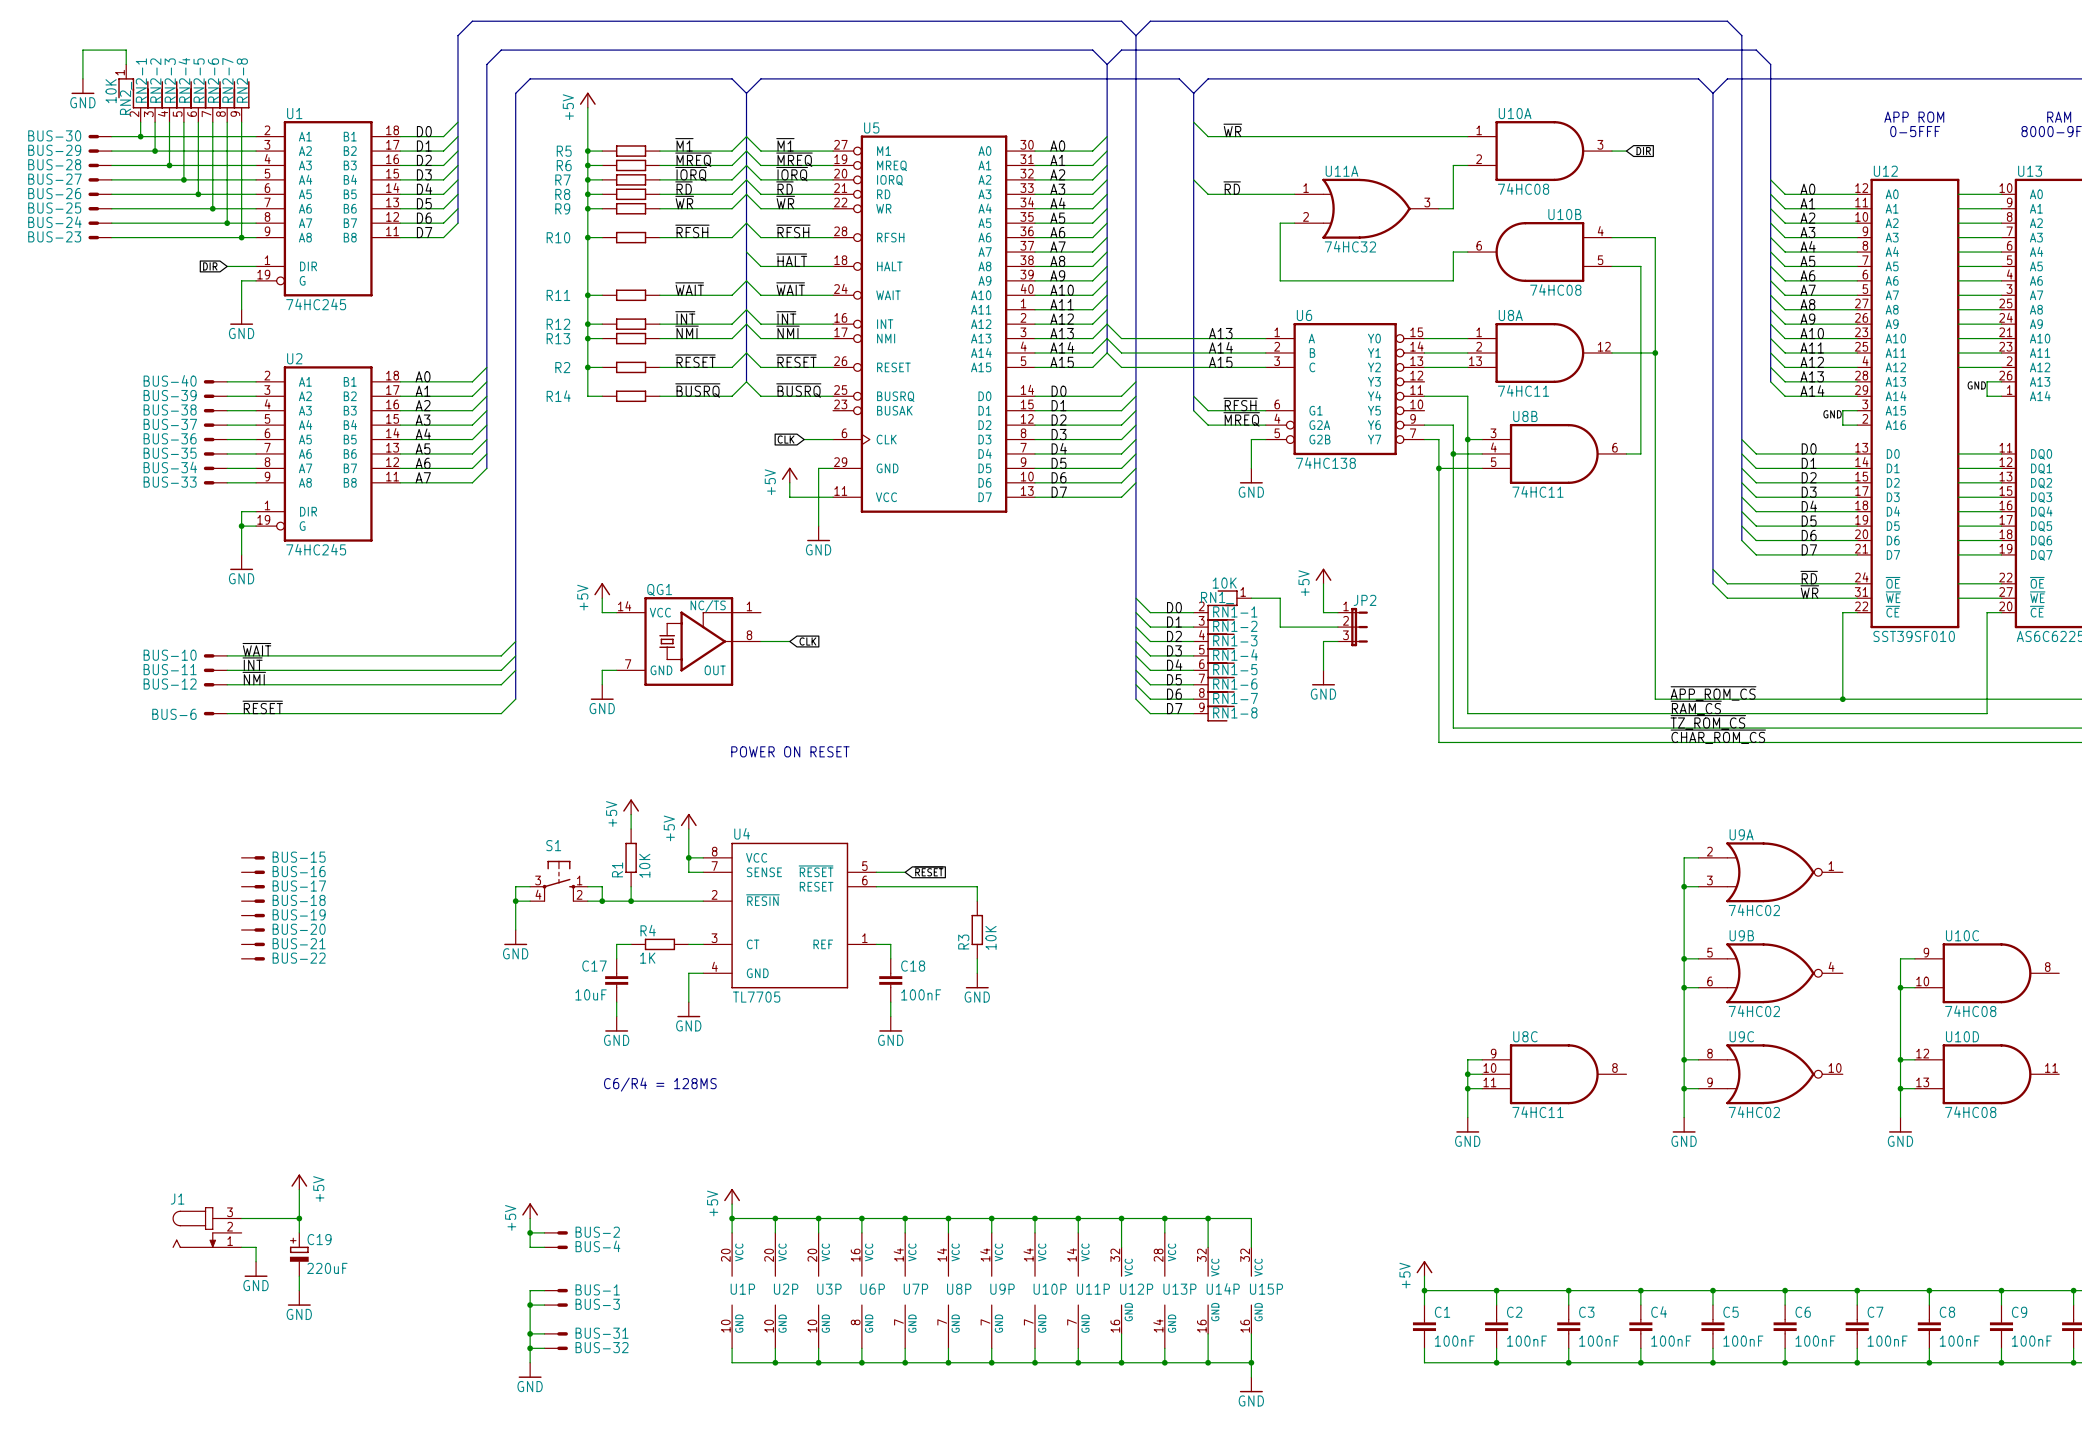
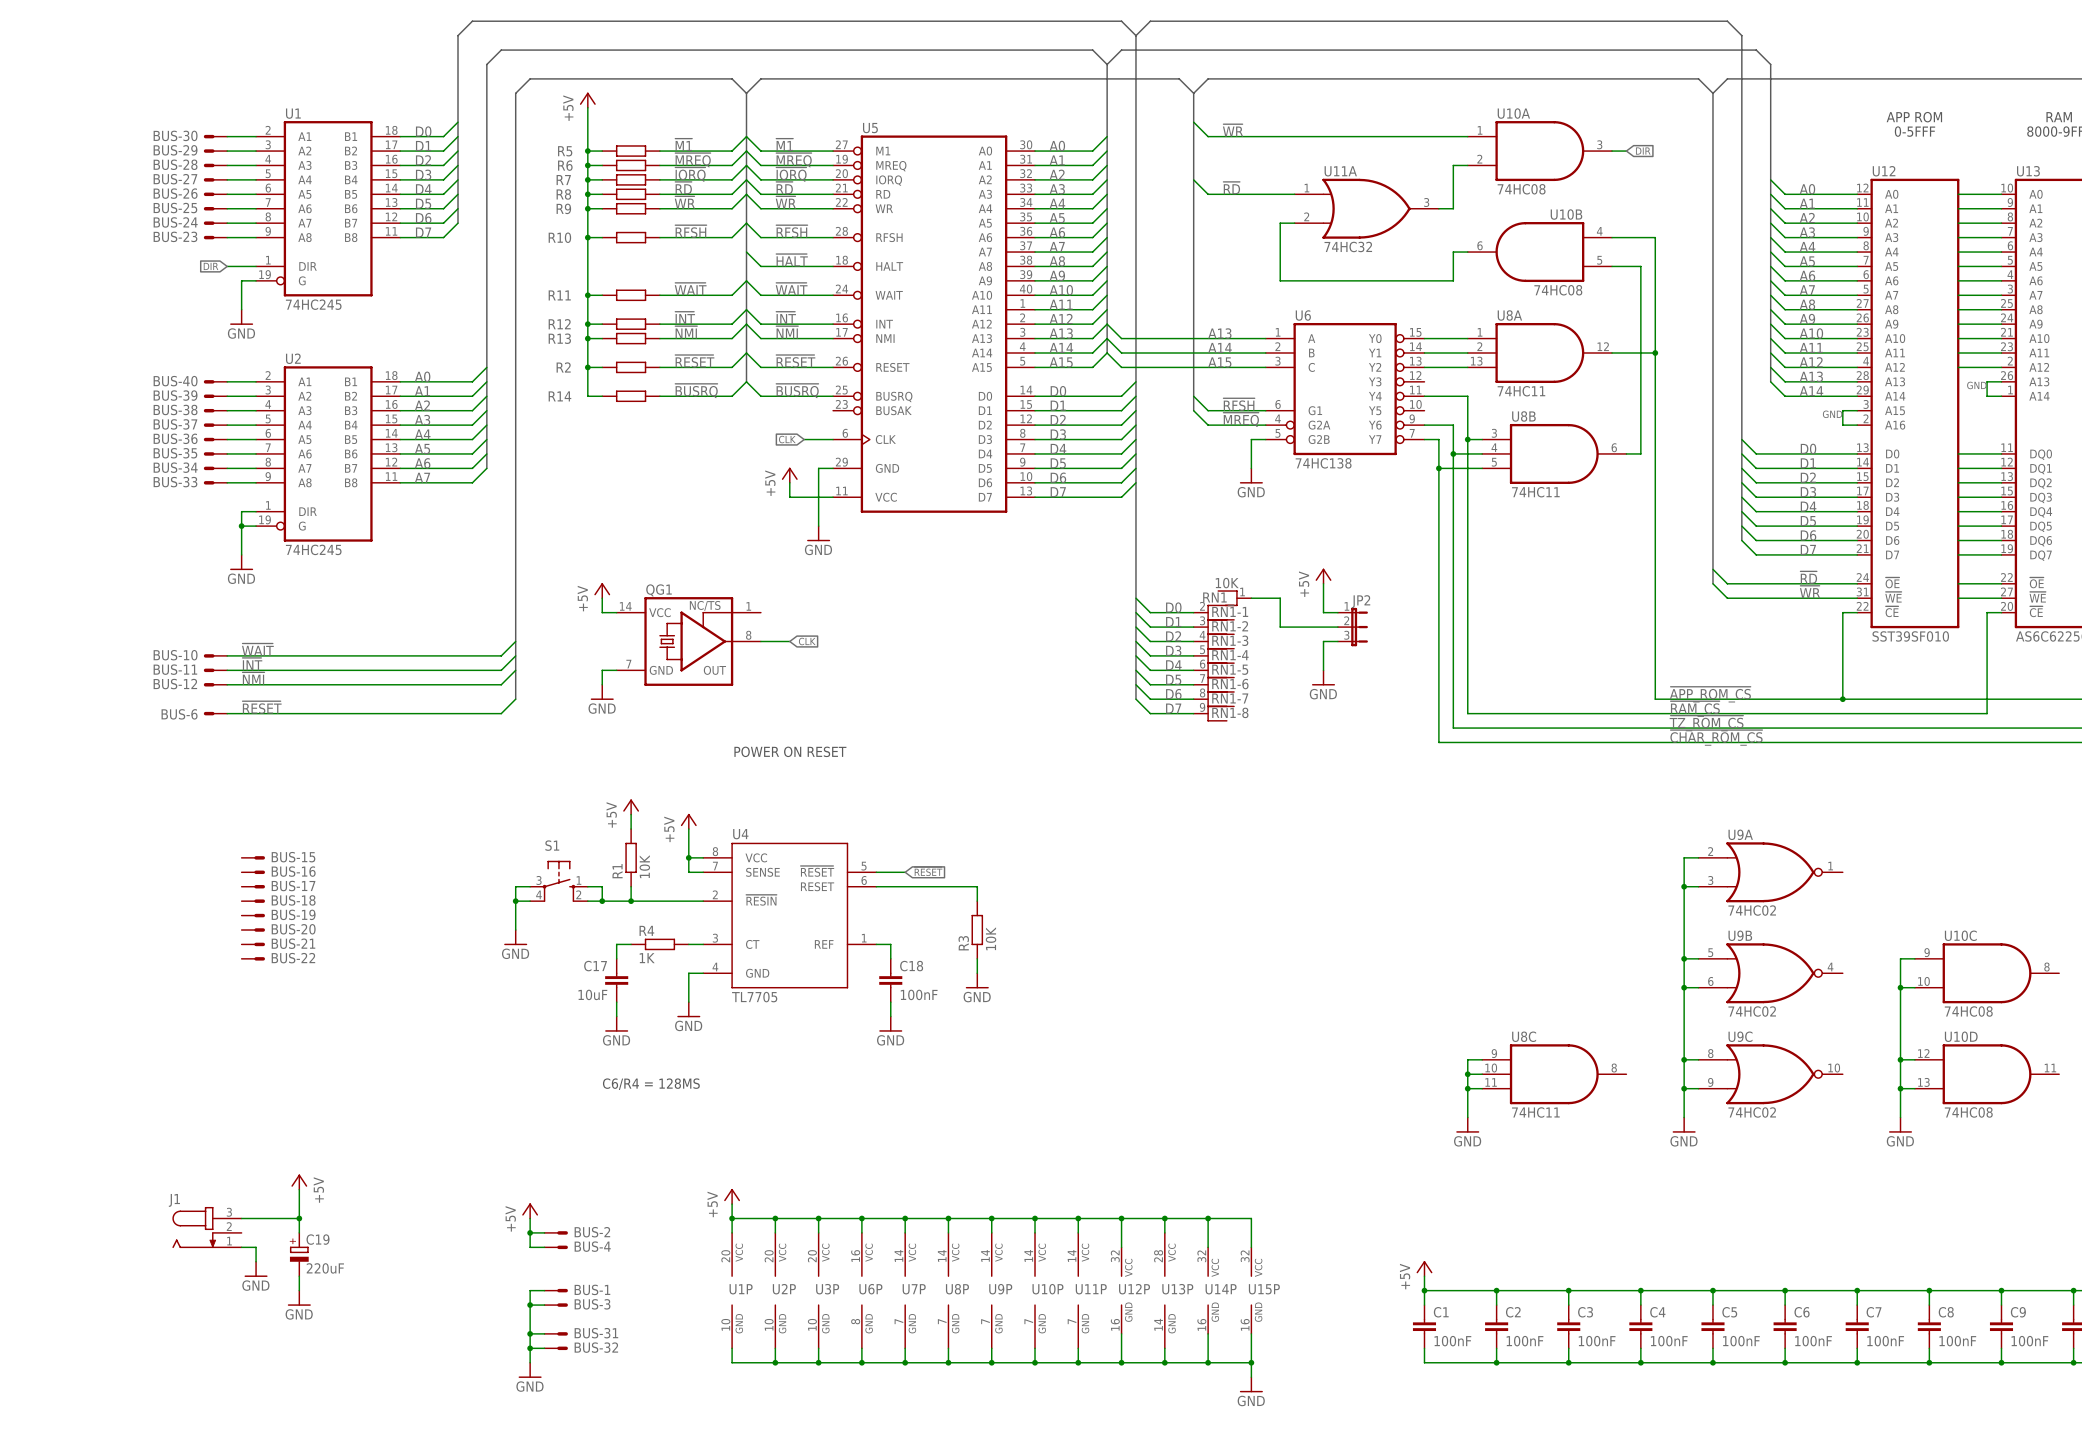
wire: (126, 64) (126, 50) (82, 50) (82, 78) -> none
RN2_: 10K (126, 81) -> none
power symbol: GND (82, 86) -> none
RN2-1: (140, 101) -> none
RN2-2: (155, 101) -> none
RN2-3: (169, 101) -> none
RN2-4: (183, 101) -> none
RN2-5: (198, 101) -> none
RN2-6: (212, 101) -> none
RN2-7: (227, 101) -> none
RN2-8: (241, 101) -> none
wire: (140, 122) (140, 136) -> none
wire: (155, 122) (155, 151) -> none
wire: (169, 122) (169, 165) -> none
wire: (183, 122) (183, 179) -> none
wire: (198, 122) (198, 194) -> none
wire: (212, 122) (212, 208) -> none
wire: (227, 122) (227, 223) (111, 223) -> none
wire: (241, 122) (241, 237) -> none
BUS-30 position: (100, 136) -> (215, 136)
wire: (111, 136) (227, 136) -> none
junction: (140, 136) -> none
BUS-29 position: (100, 151) -> (215, 151)
wire: (111, 151) (227, 151) -> none
junction: (155, 151) -> none
BUS-28 position: (100, 165) -> (215, 165)
wire: (111, 165) (227, 165) -> none
junction: (169, 165) -> none
BUS-27 position: (100, 179) -> (215, 179)
wire: (111, 179) (227, 179) -> none
junction: (183, 179) -> none
BUS-26 position: (100, 194) -> (215, 194)
wire: (111, 194) (227, 194) -> none
junction: (198, 194) -> none
BUS-25 position: (100, 208) -> (215, 208)
wire: (111, 208) (227, 208) -> none
junction: (212, 208) -> none
BUS-24 position: (100, 223) -> (215, 223)
junction: (227, 223) -> none
BUS-23 position: (100, 237) -> (215, 237)
wire: (111, 237) (227, 237) -> none
junction: (241, 237) -> none

